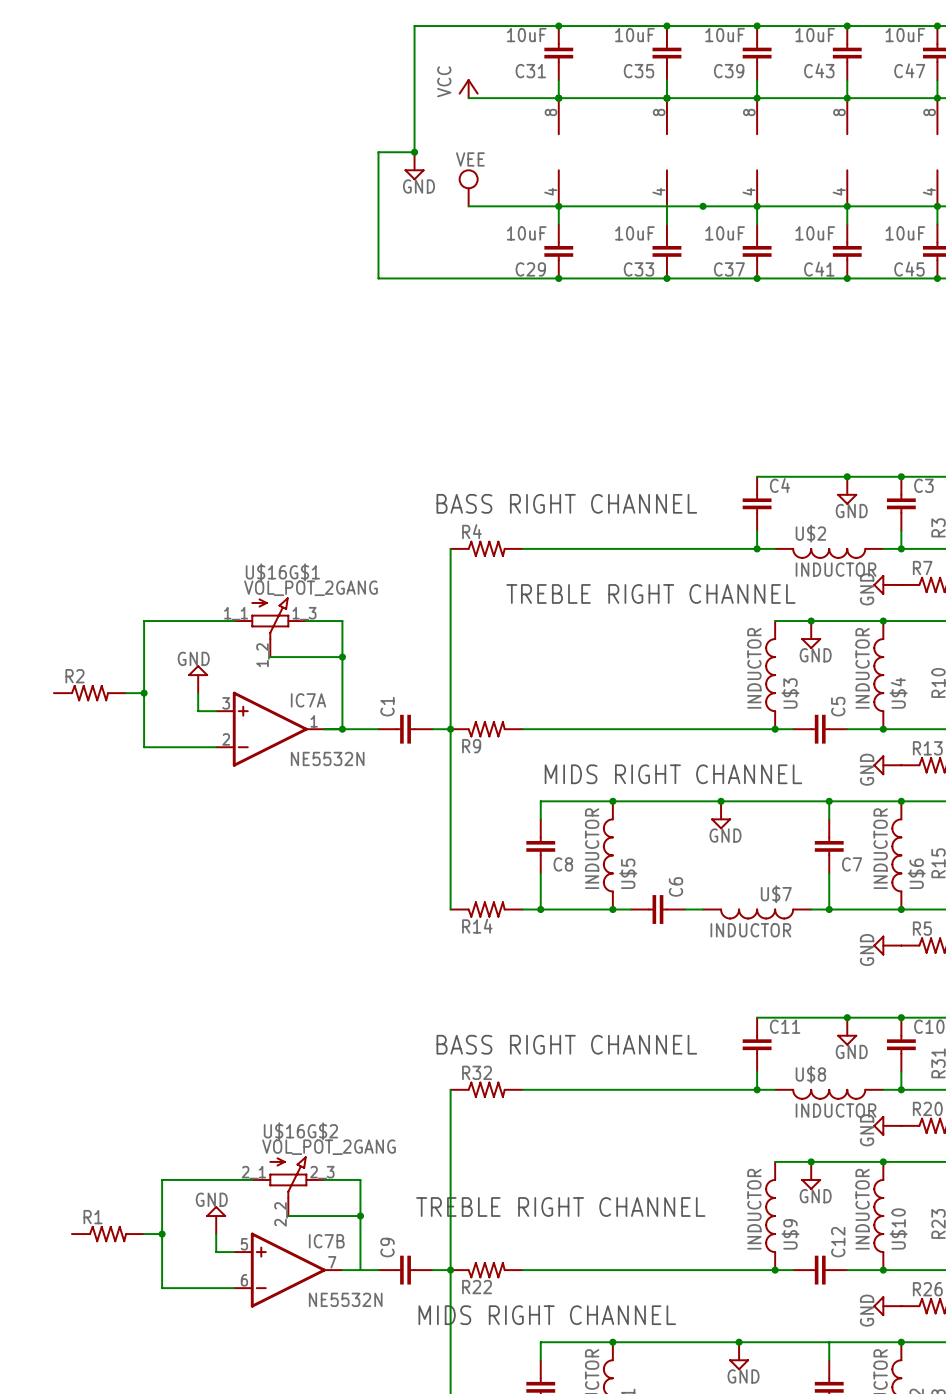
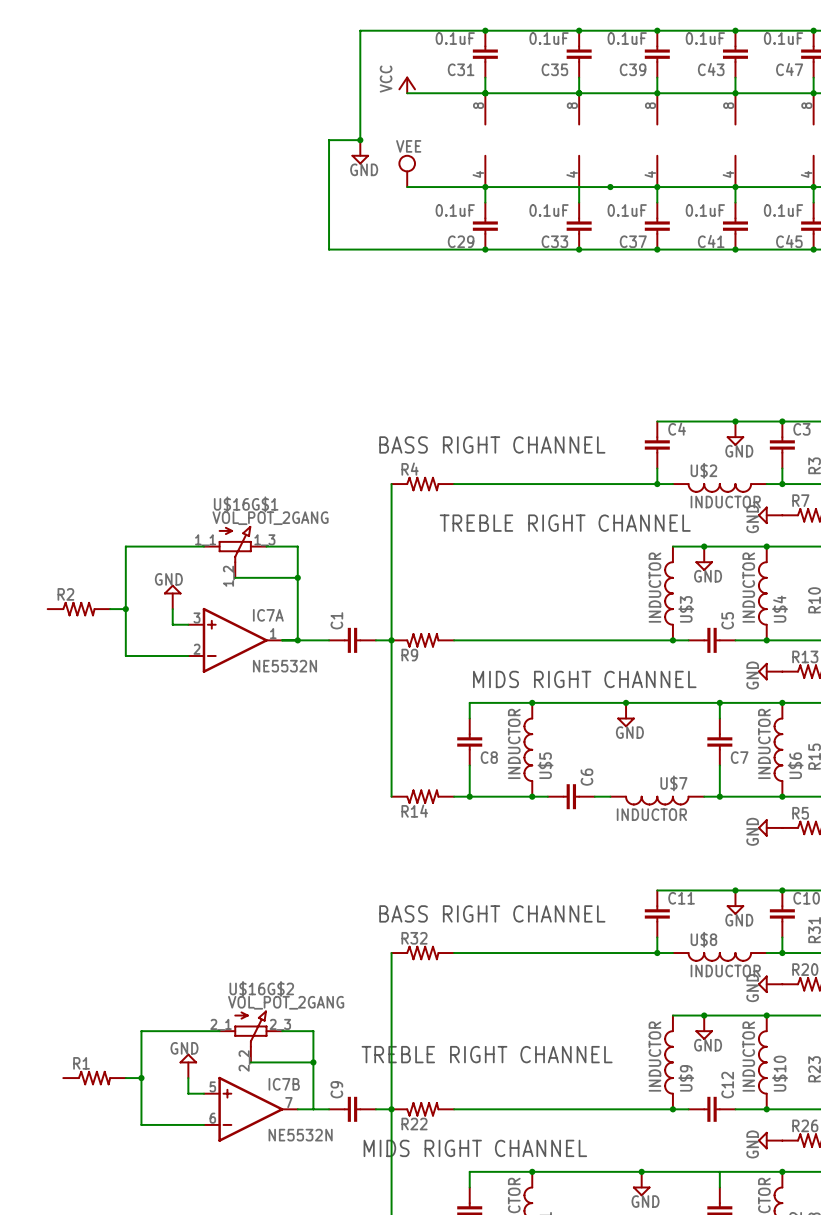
C31 value: 10uF (526, 35) -> 0.1uF (455, 38)
C35 value: 10uF (634, 35) -> 0.1uF (549, 38)
C39 value: 10uF (725, 35) -> 0.1uF (627, 38)
C43 value: 10uF (815, 35) -> 0.1uF (705, 38)
C47 value: 10uF (905, 35) -> 0.1uF (783, 38)
C29 value: 10uF (526, 233) -> 0.1uF (455, 210)
C33 value: 10uF (634, 233) -> 0.1uF (549, 210)
C37 value: 10uF (725, 233) -> 0.1uF (627, 210)
C41 value: 10uF (815, 233) -> 0.1uF (705, 210)
C45 value: 10uF (905, 233) -> 0.1uF (783, 210)

